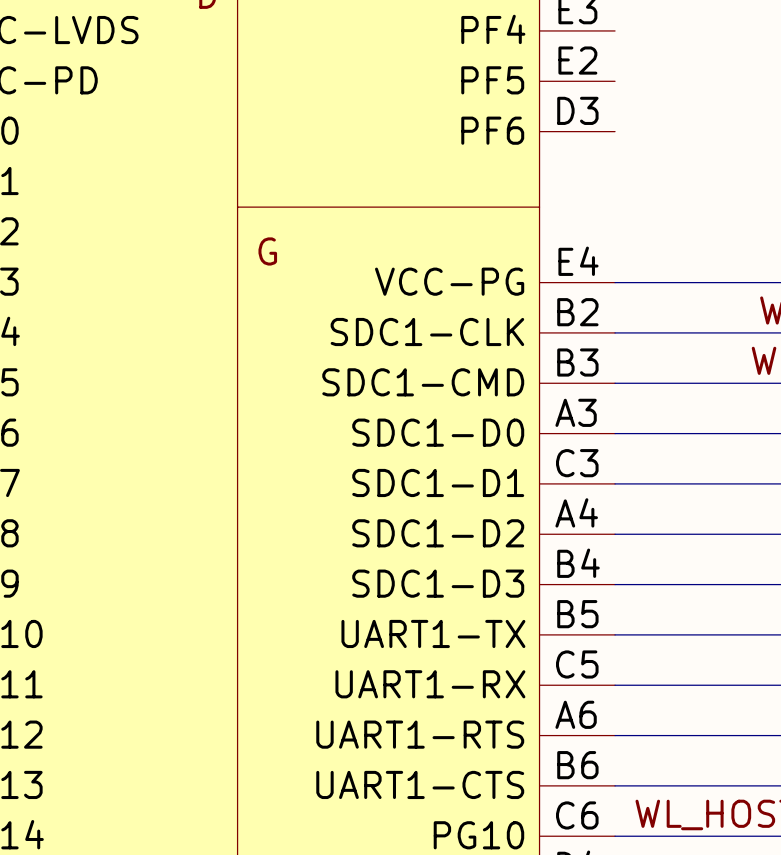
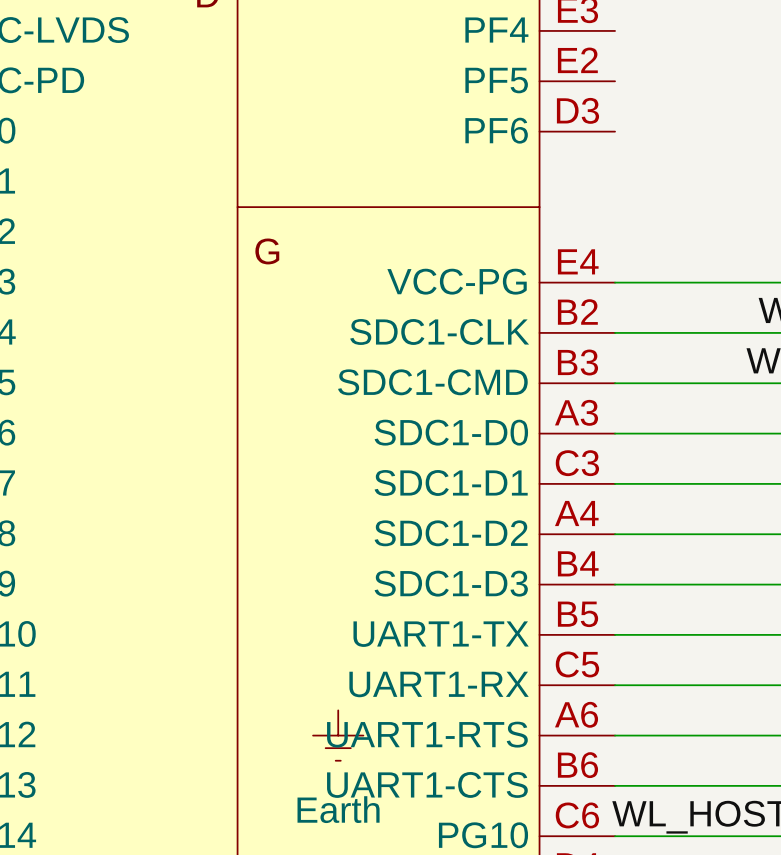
power symbol: none -> Earth (338, 735)

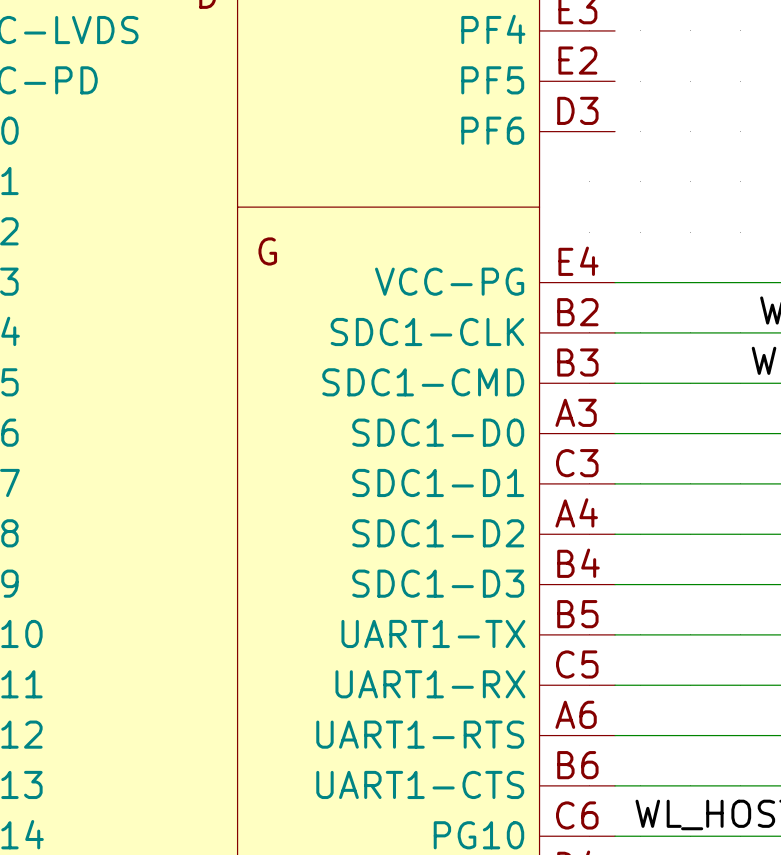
power symbol: Earth (338, 735) -> none

